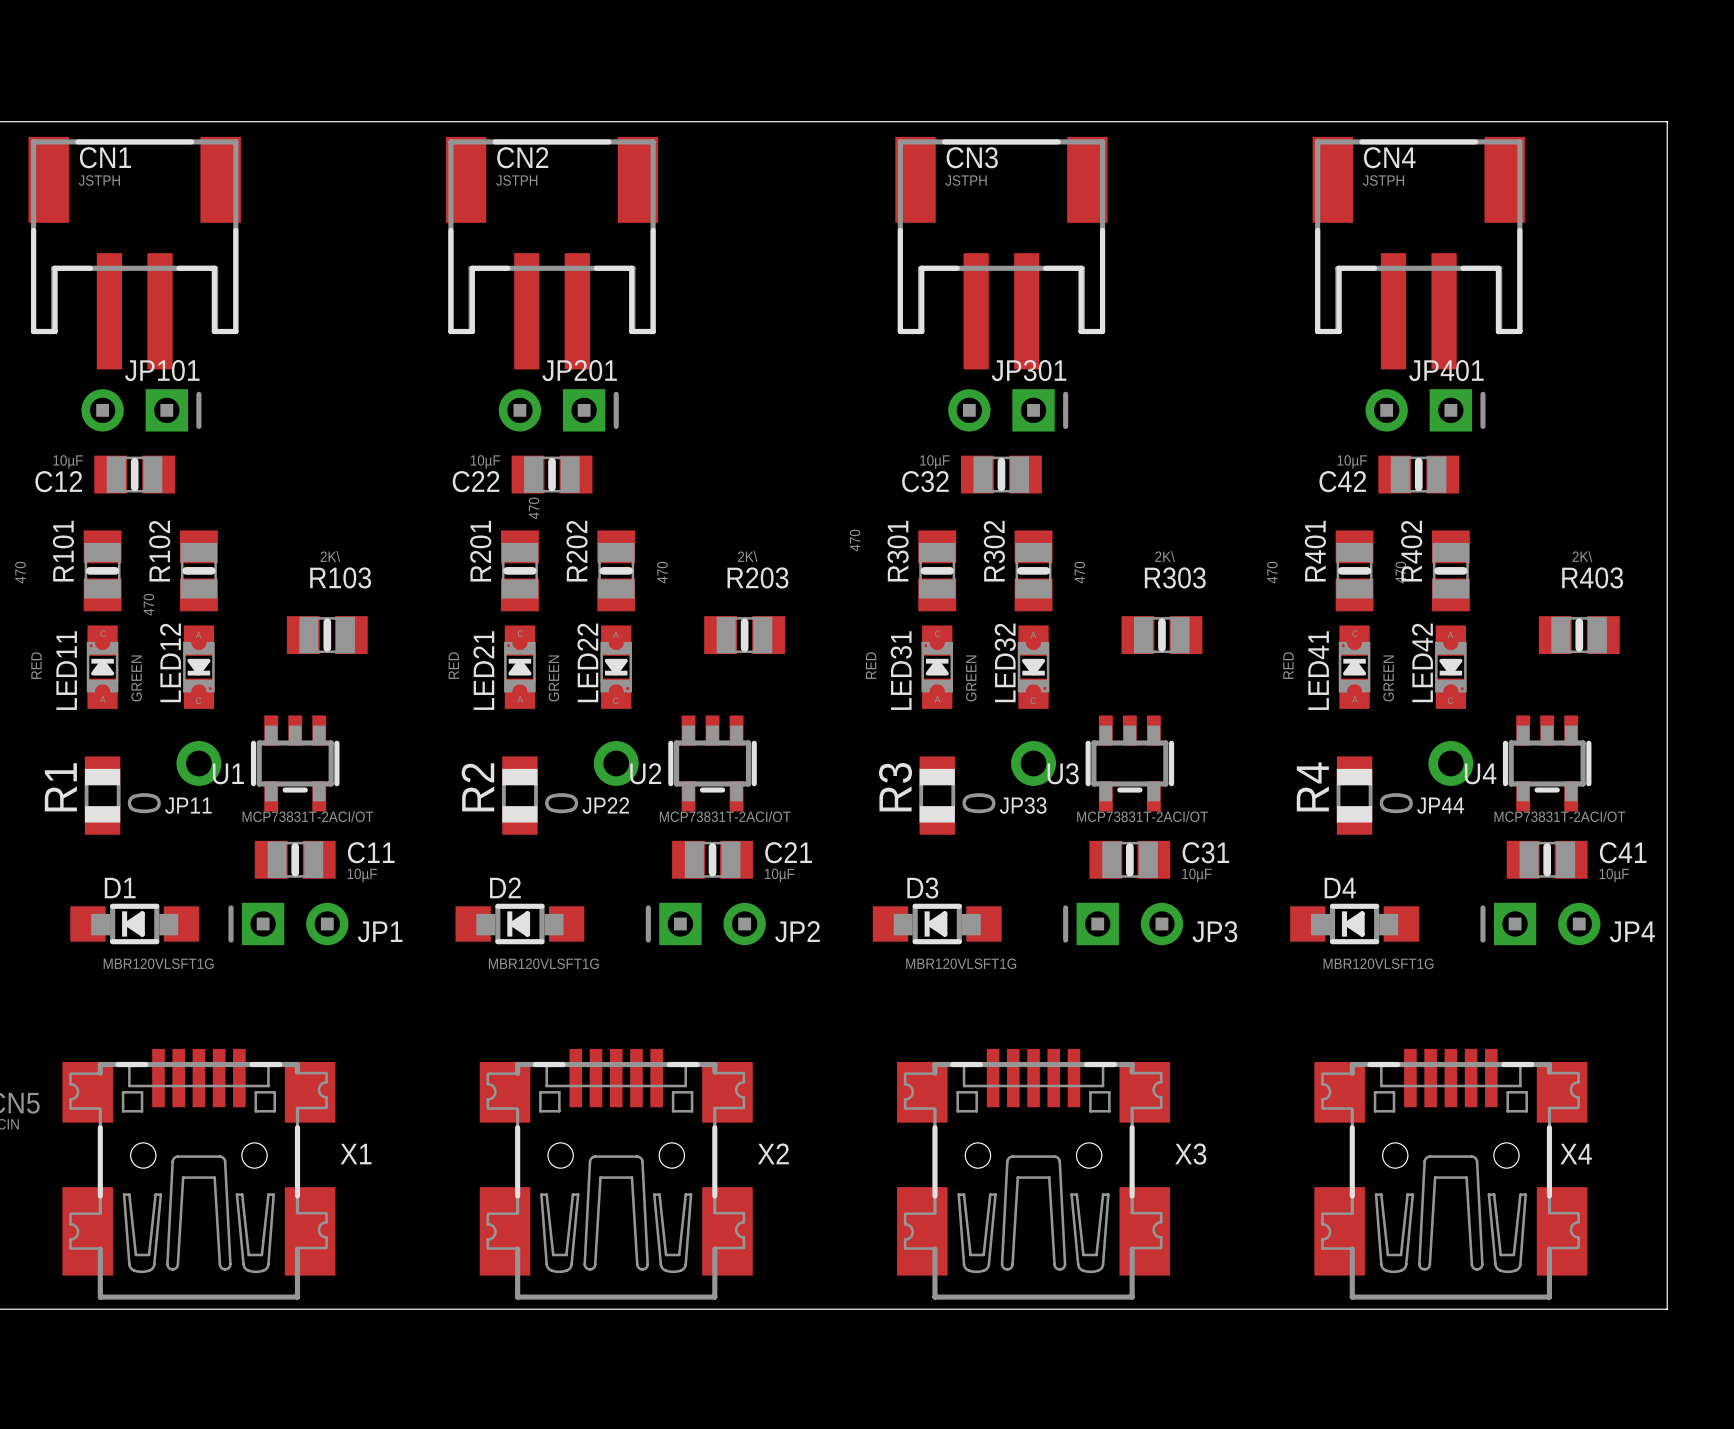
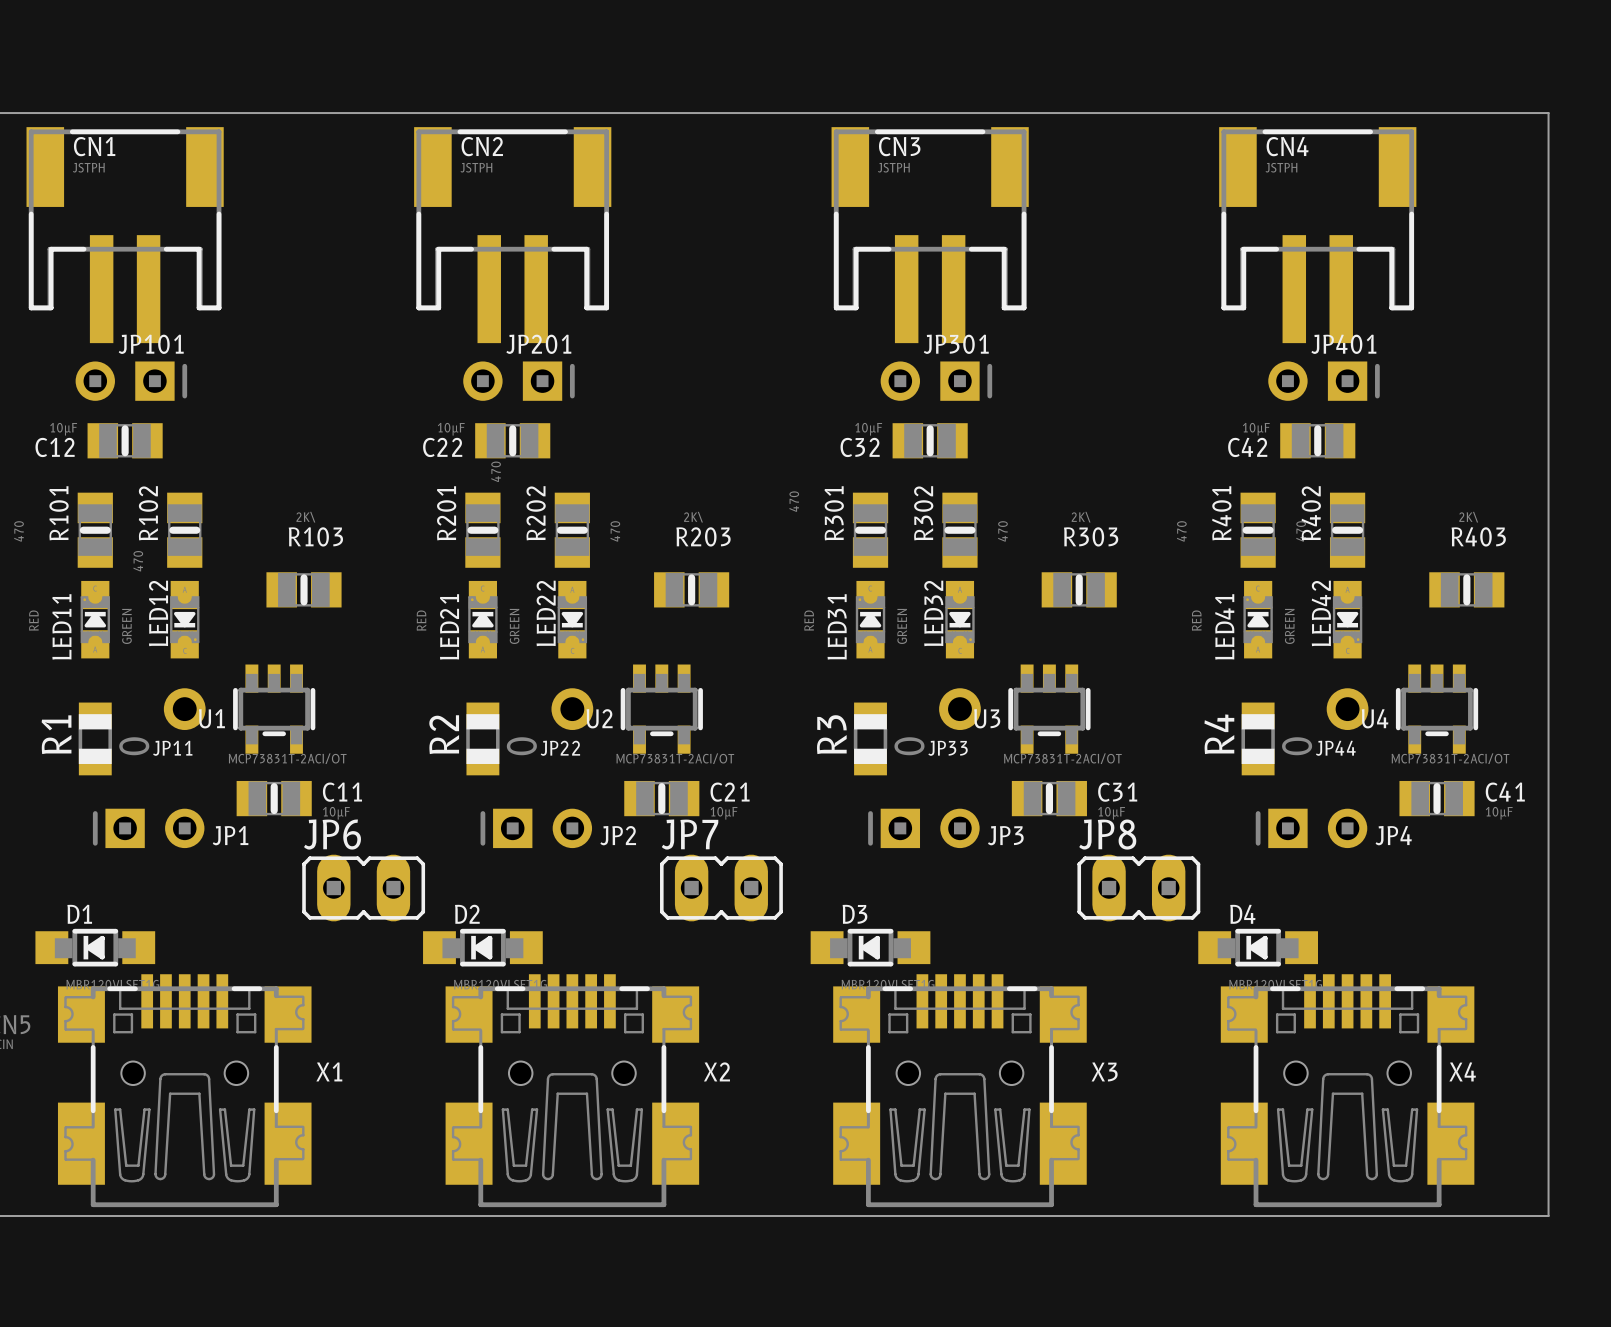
D1 position: (134, 923) -> (95, 947)
JP1 position: (288, 923) -> (148, 828)
D2 position: (519, 923) -> (482, 947)
JP2 position: (705, 923) -> (536, 828)
D3 position: (937, 923) -> (870, 947)
JP3 position: (1123, 923) -> (923, 828)
D4 position: (1354, 923) -> (1258, 947)
JP4 position: (1540, 923) -> (1311, 828)
JP6: none -> (363, 888)
JP7: none -> (721, 888)
JP8: none -> (1138, 888)

